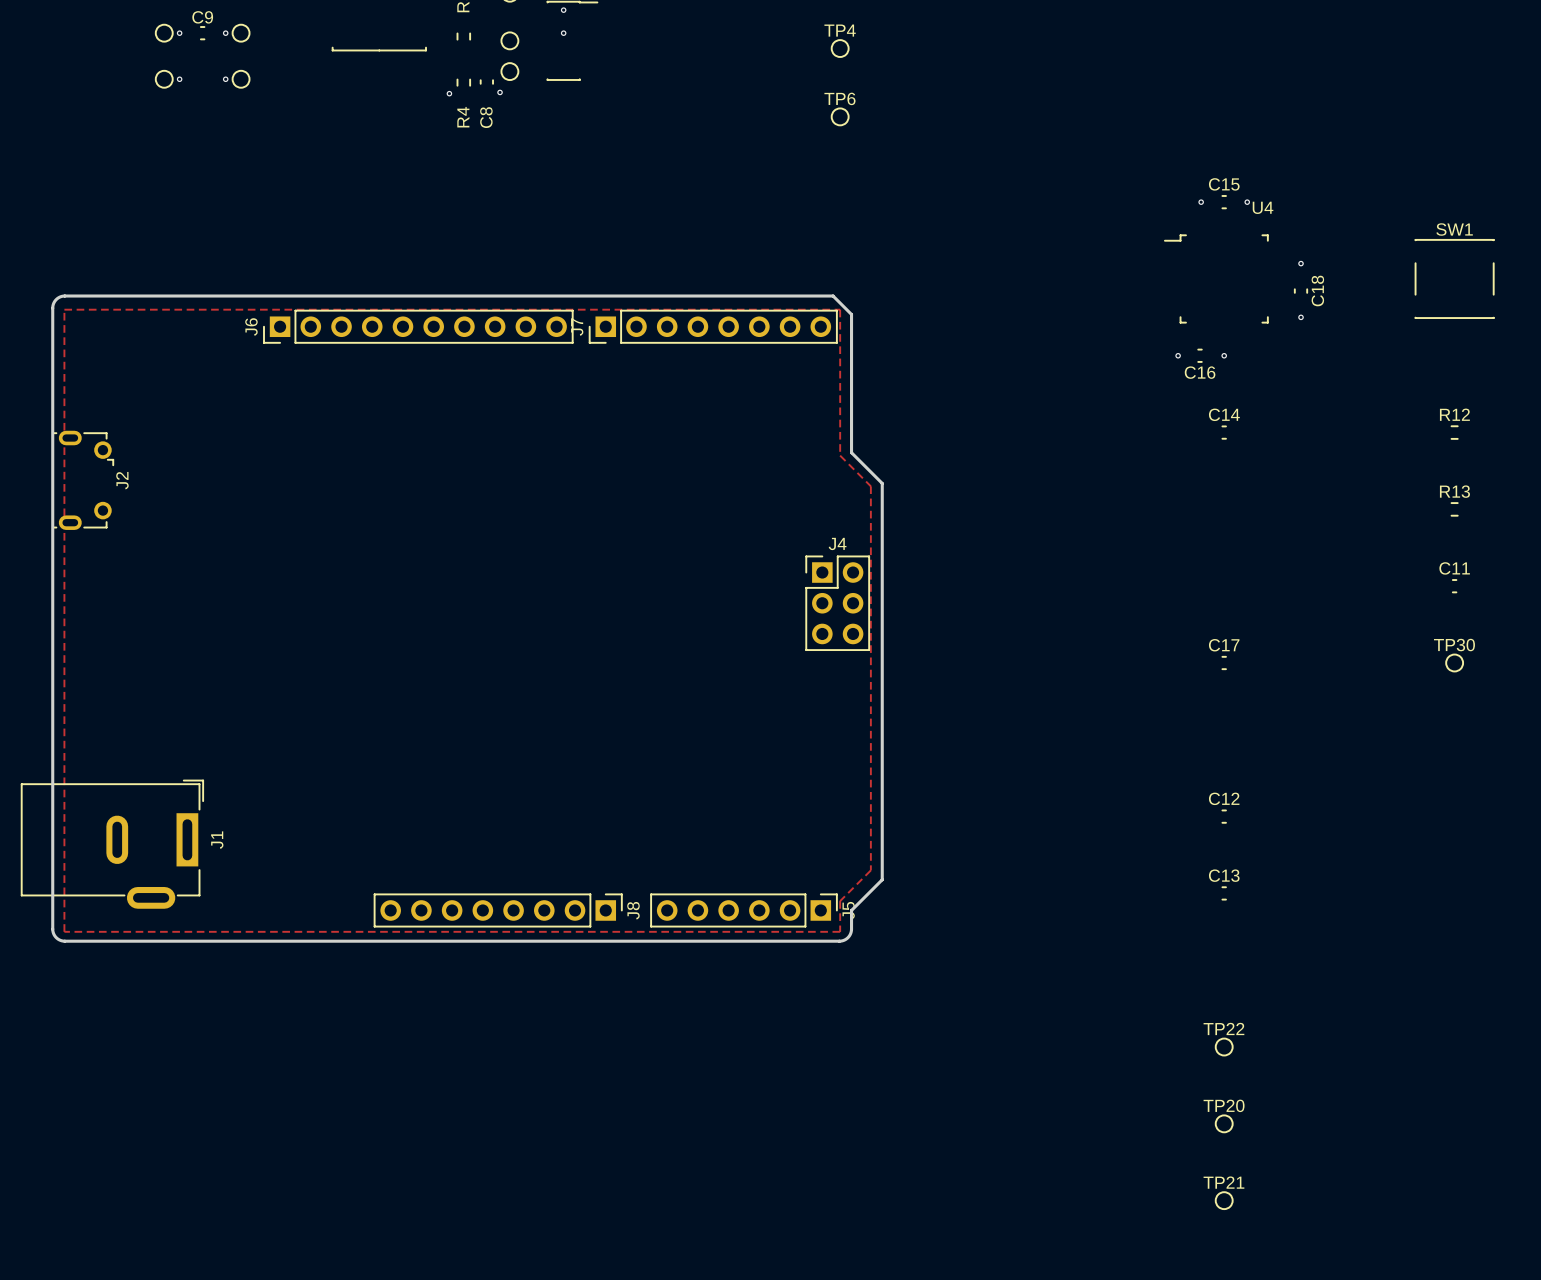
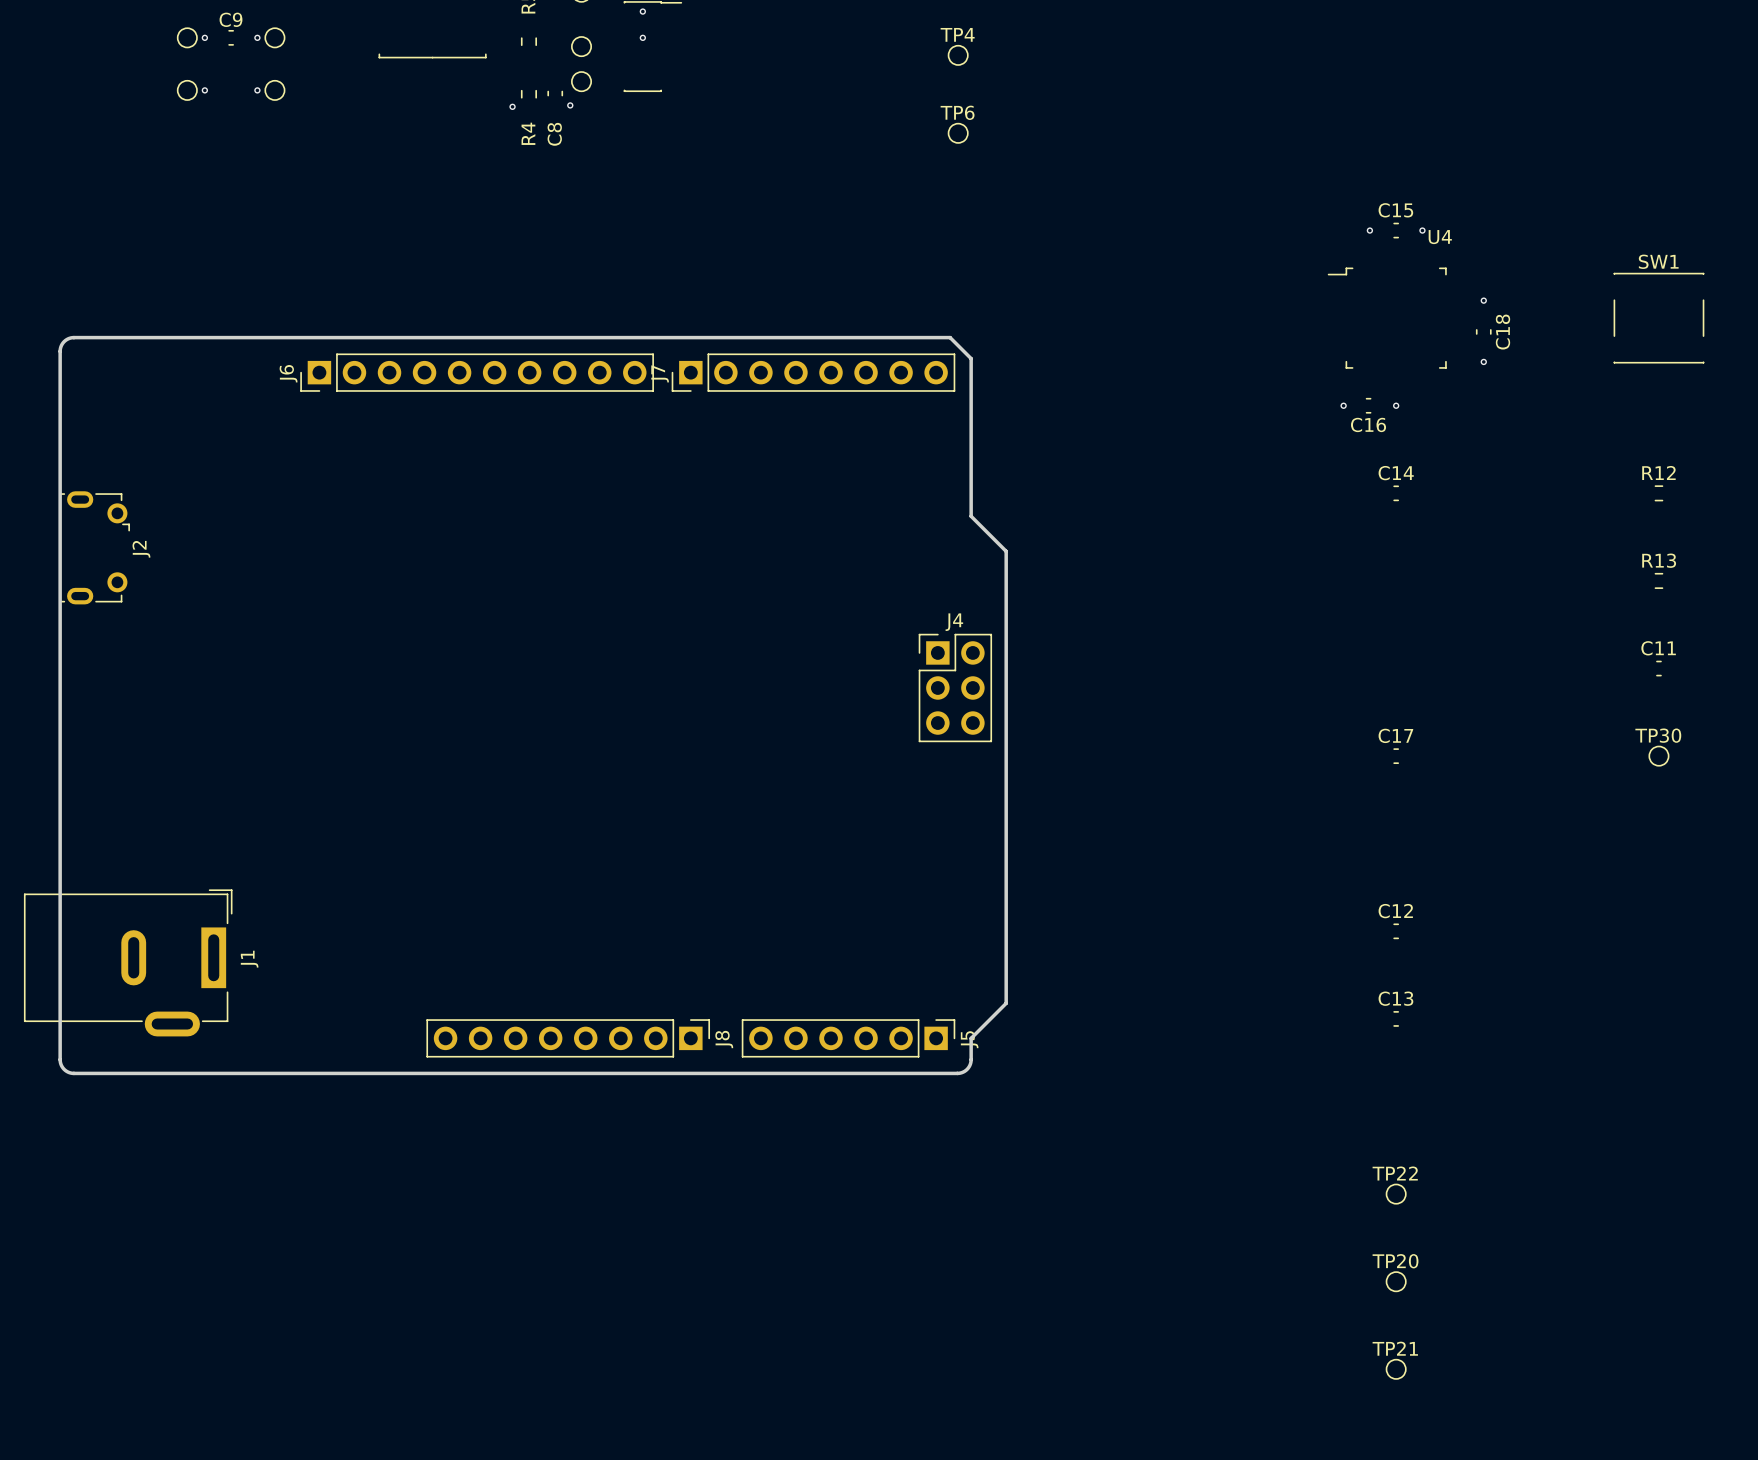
zone outline: (64, 309) (64, 931) (840, 931) (840, 901) (870, 870) (870, 486) (840, 455) (840, 309) (64, 309) -> none

